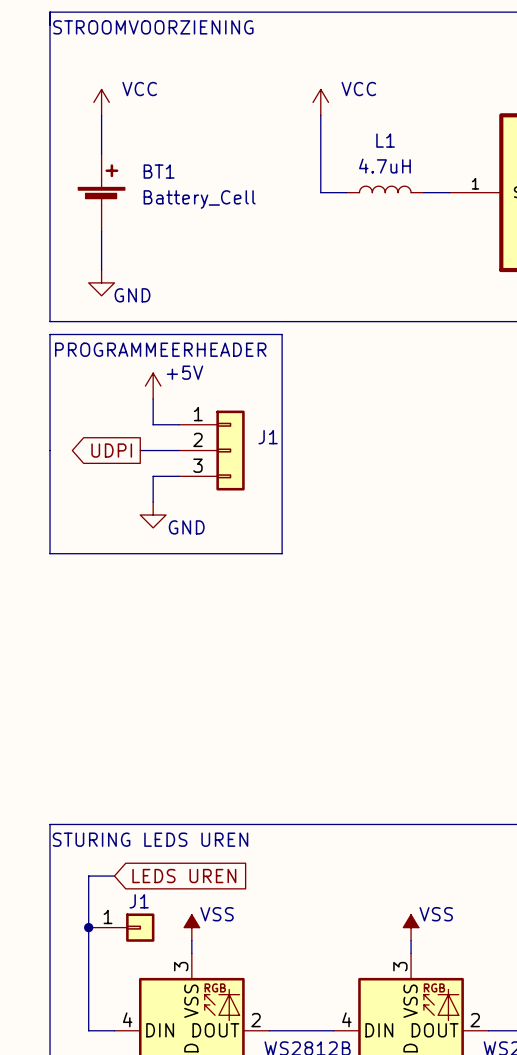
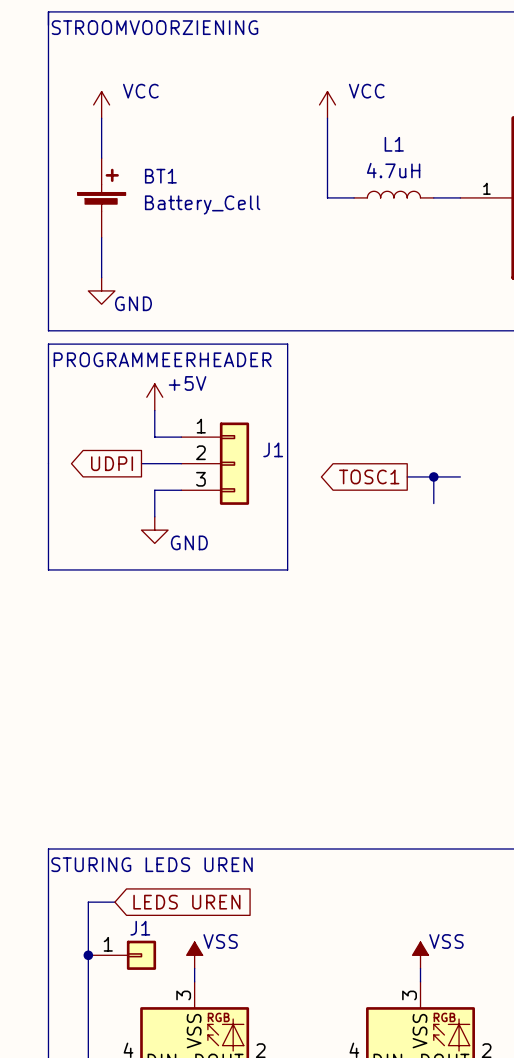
global label: none -> TOSC1 (369, 476)
wire: none -> (407, 476) (460, 476)
wire: none -> (433, 476) (433, 503)
junction: none -> (433, 476)

